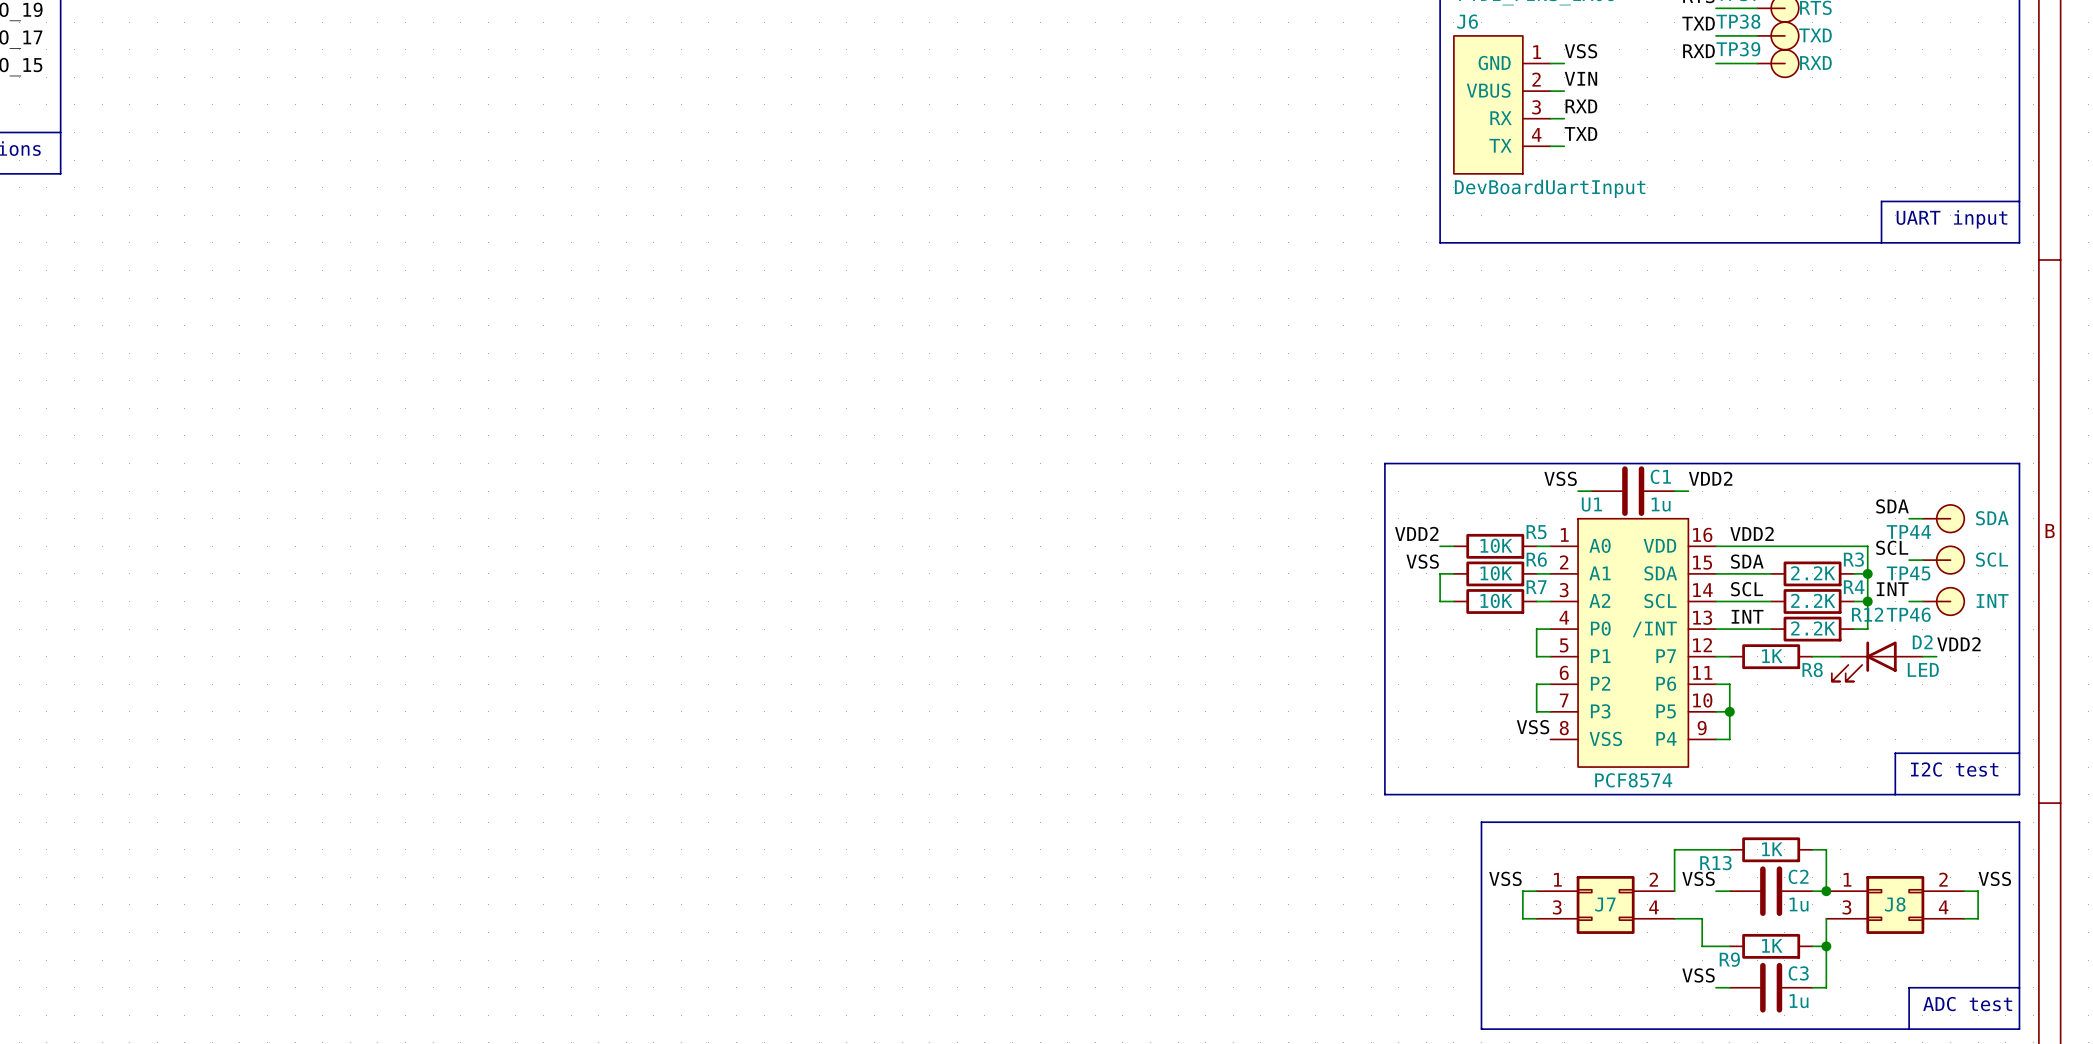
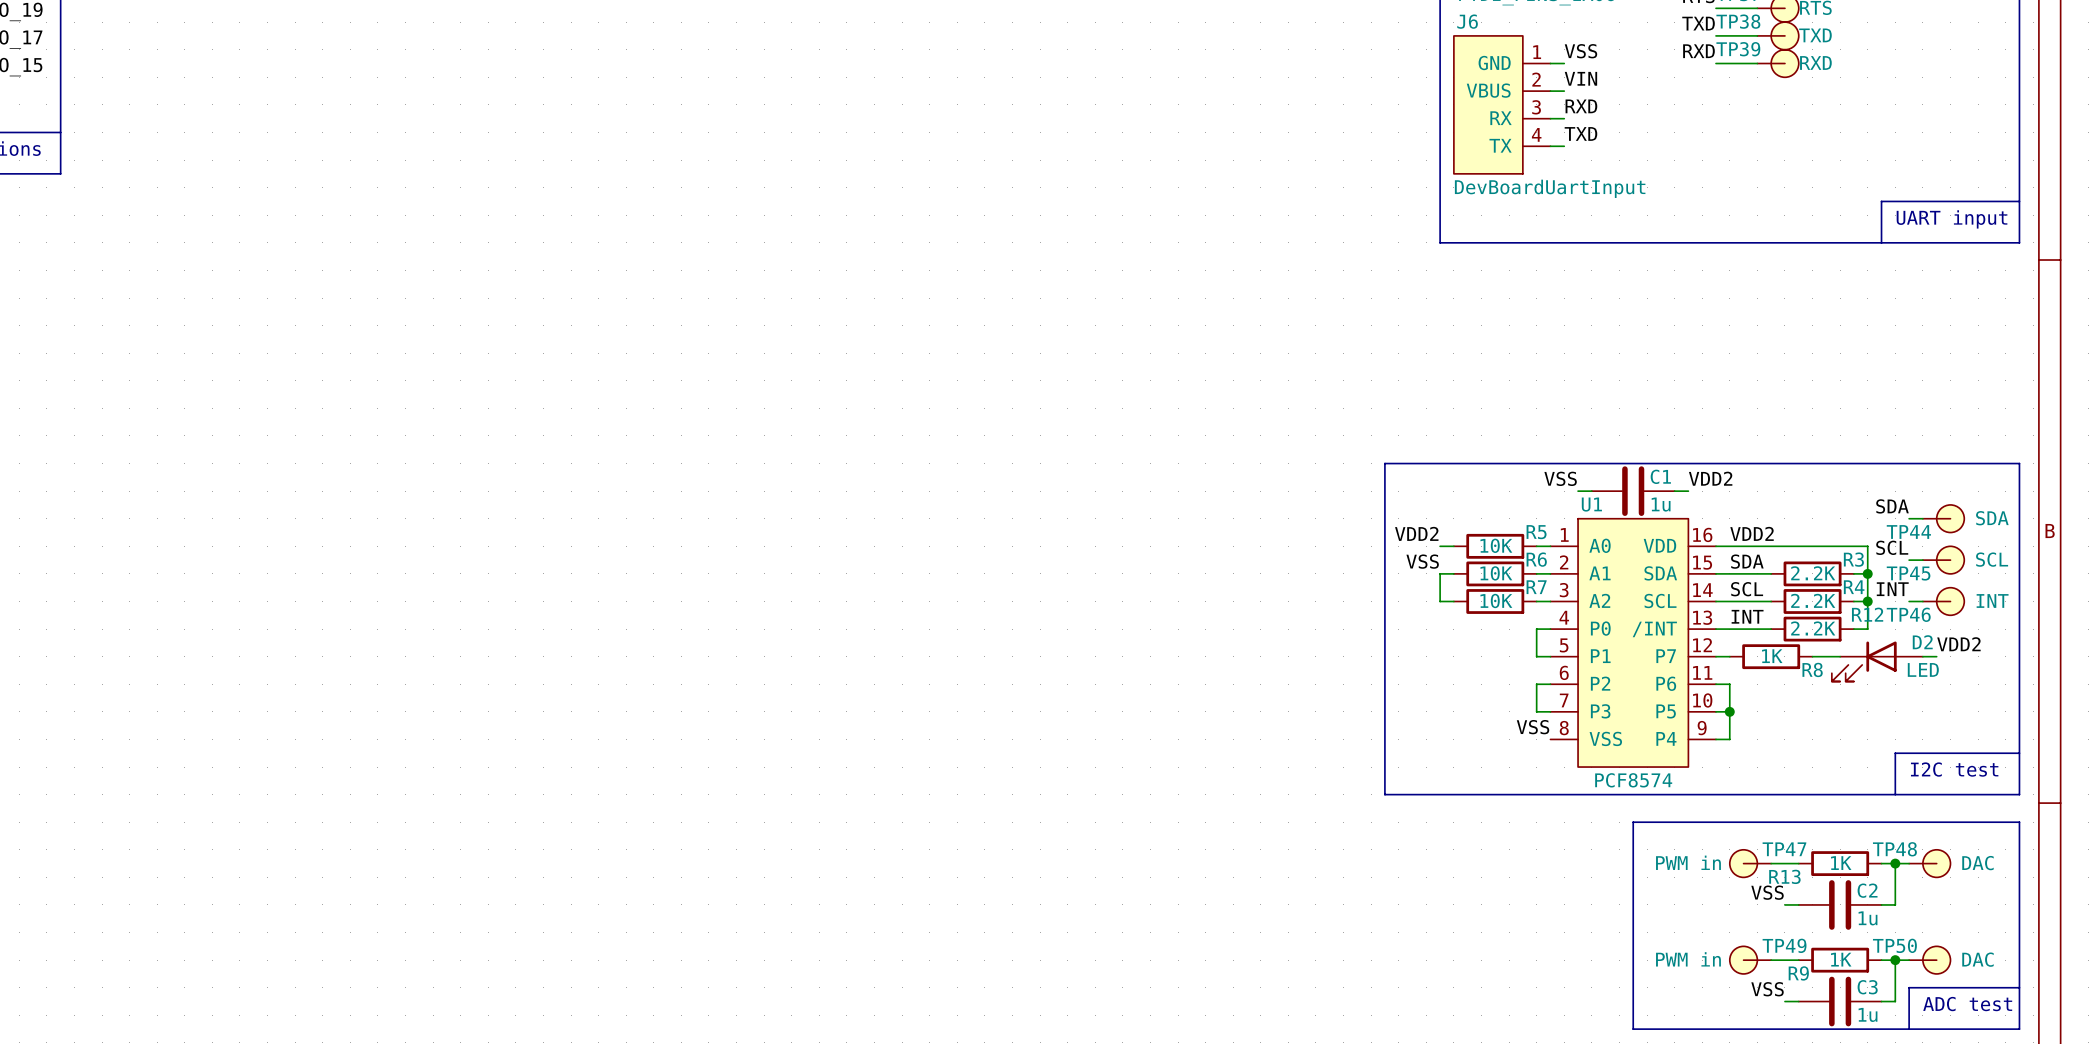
line: (1633, 822) (1481, 822) (1481, 1029) (1633, 1029) -> (1633, 822) (1633, 1029)
wire: (1729, 849) (1674, 849) (1674, 891) -> none
R13 position: (1771, 849) -> (1840, 863)
wire: (1812, 849) (1826, 849) (1826, 891) (1812, 891) -> none
TP47: none -> PWM in (1750, 863)
wire: none -> (1771, 863) (1798, 863)
wire: none -> (1881, 863) (1909, 863)
junction: none -> (1895, 863)
TP48: none -> DAC (1929, 863)
label: VSS (1505, 878) -> none
label: VSS (1698, 878) -> none
label: VSS (1994, 878) -> none
wire: (1536, 891) (1522, 891) (1522, 918) (1536, 918) -> none
wire: (1715, 891) (1729, 891) -> (1784, 904) (1798, 904)
C2 position: (1771, 891) -> (1840, 904)
junction: (1826, 891) -> none
wire: (1964, 891) (1978, 891) (1978, 918) (1964, 918) -> none
label: none -> VSS (1767, 892)
J7: (1605, 904) -> none
J8: (1895, 904) -> none
wire: (1674, 918) (1702, 918) (1702, 946) (1729, 946) -> none
wire: (1826, 918) (1826, 987) (1812, 987) -> none
R9 position: (1771, 946) -> (1840, 960)
wire: (1812, 946) (1826, 946) -> none
junction: (1826, 946) -> none
TP49: none -> PWM in (1750, 960)
wire: none -> (1771, 960) (1798, 960)
wire: none -> (1881, 960) (1909, 960)
wire: none -> (1895, 960) (1895, 1001) (1881, 1001)
junction: none -> (1895, 960)
TP50: none -> DAC (1929, 960)
label: VSS (1698, 975) -> none
wire: (1715, 987) (1729, 987) -> (1784, 1001) (1798, 1001)
C3 position: (1771, 987) -> (1840, 1001)
label: none -> VSS (1767, 989)

